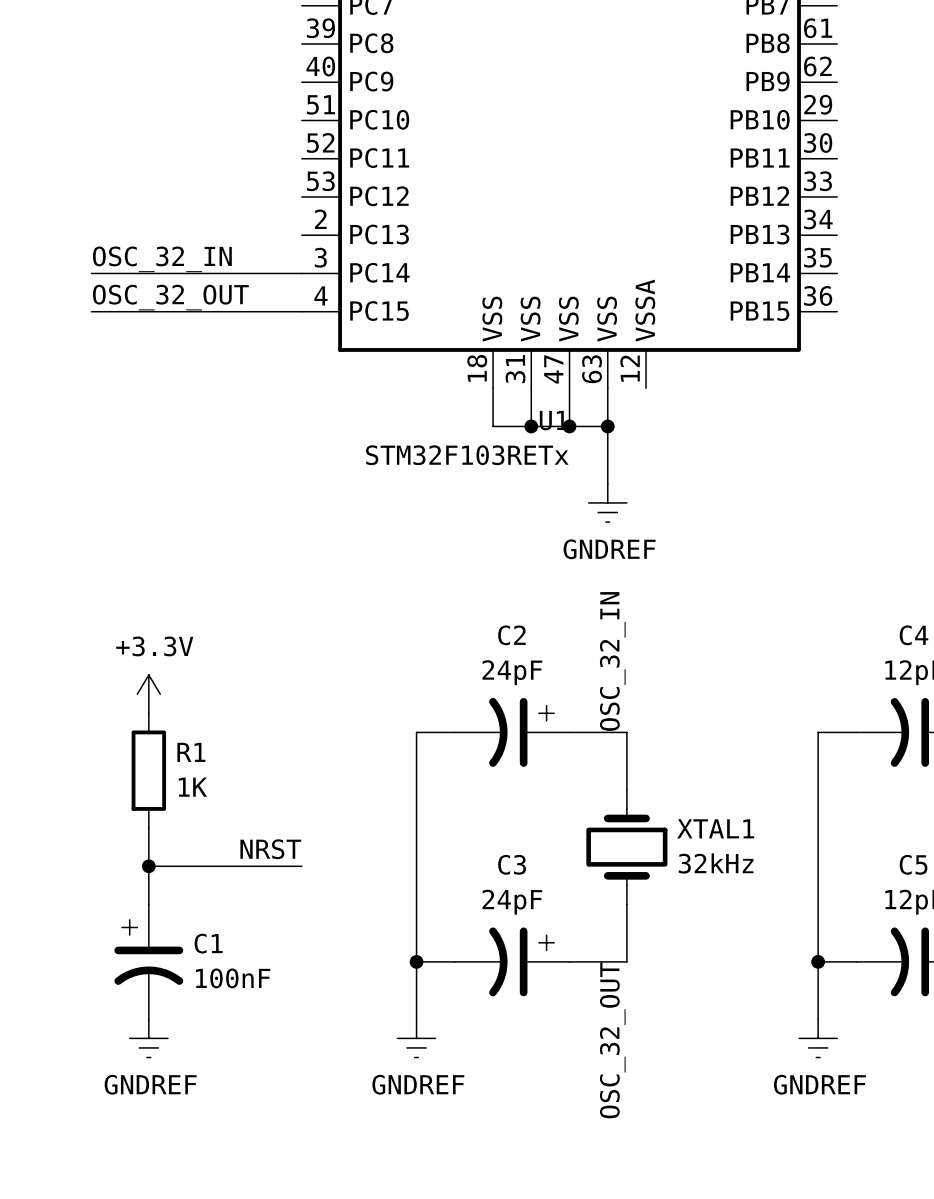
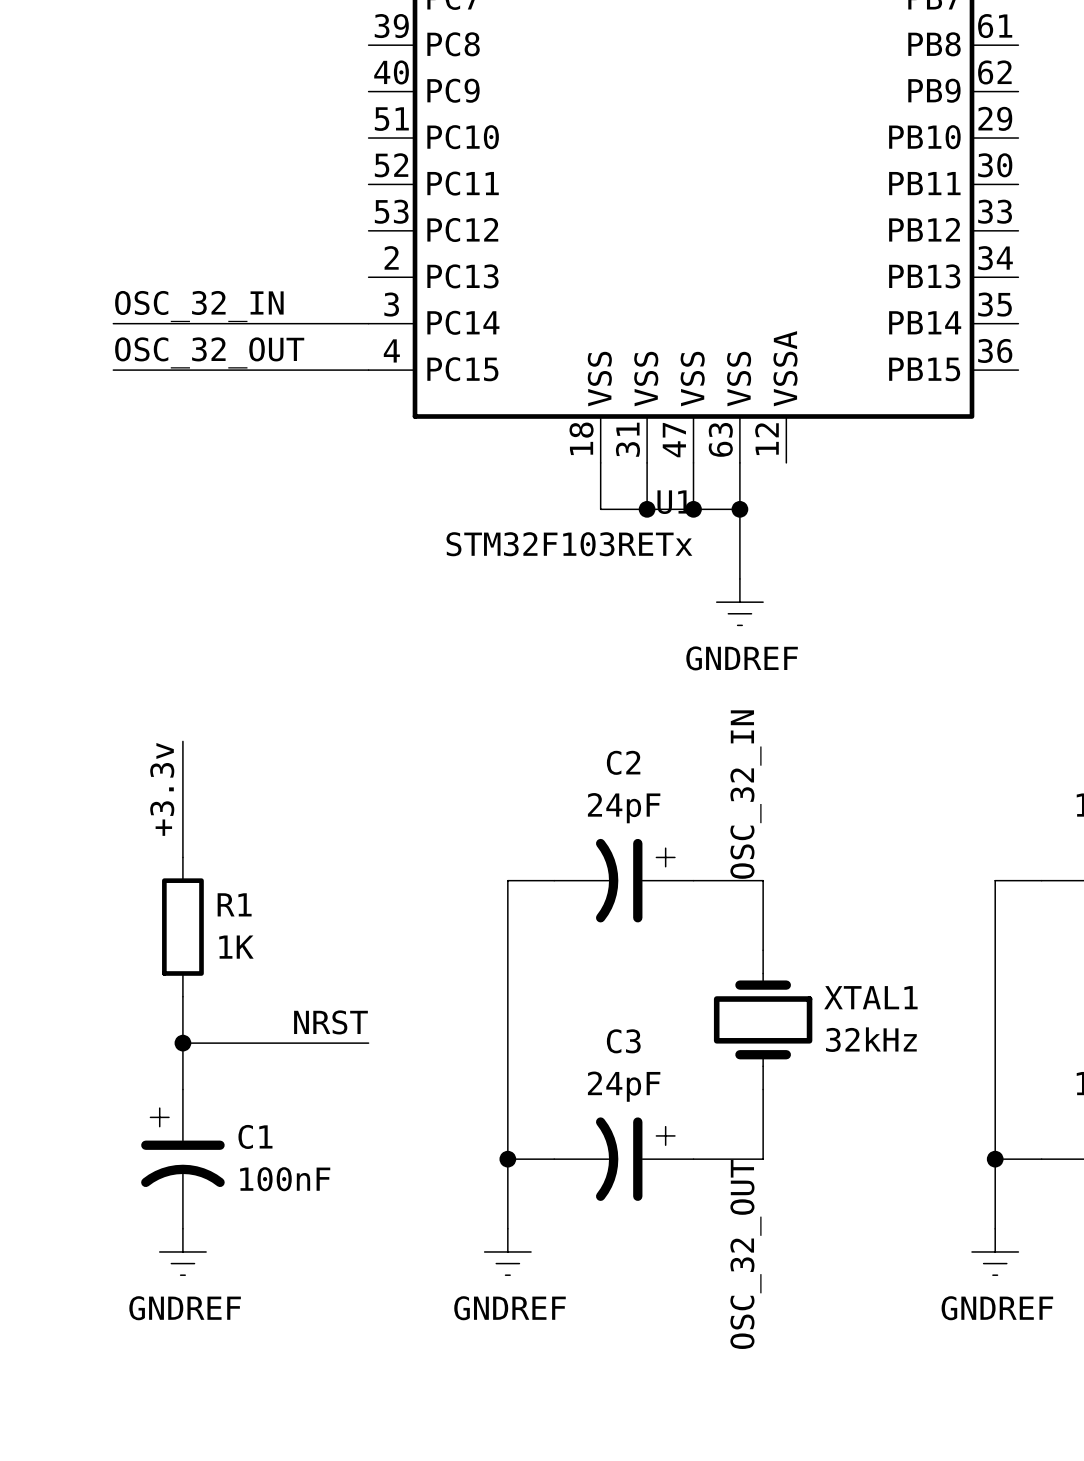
wire: none -> (182, 741) (182, 857)
label: none -> +3.3v (162, 789)
power symbol: +3.3V (148, 694) -> none

